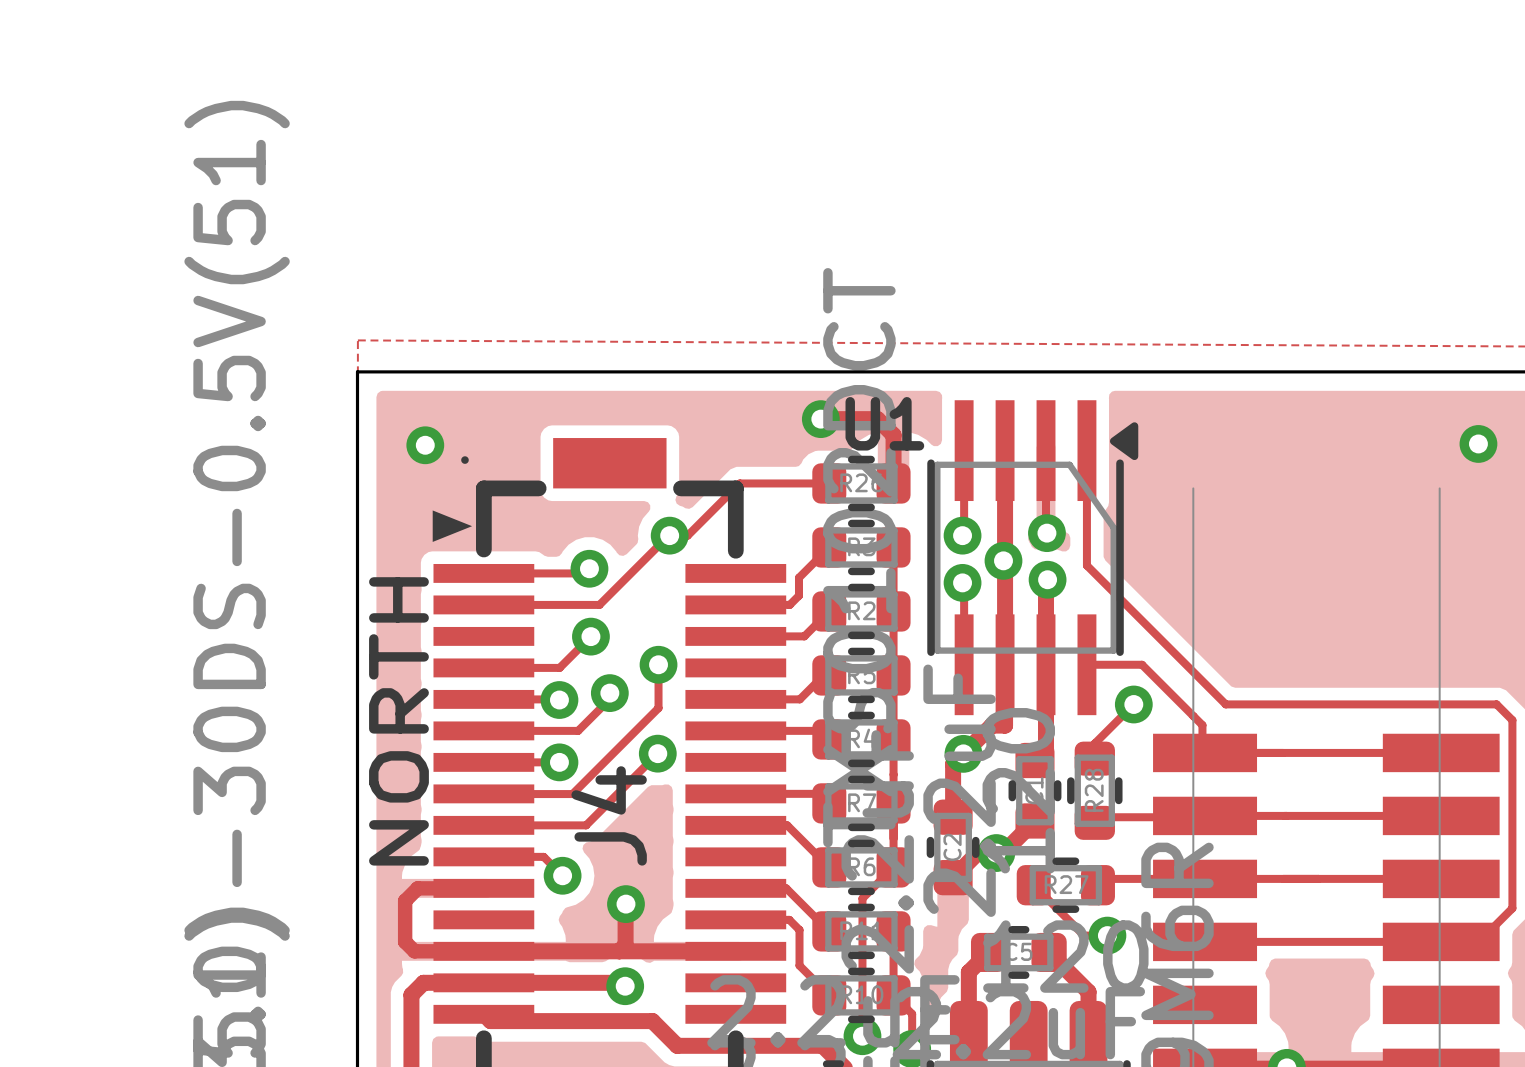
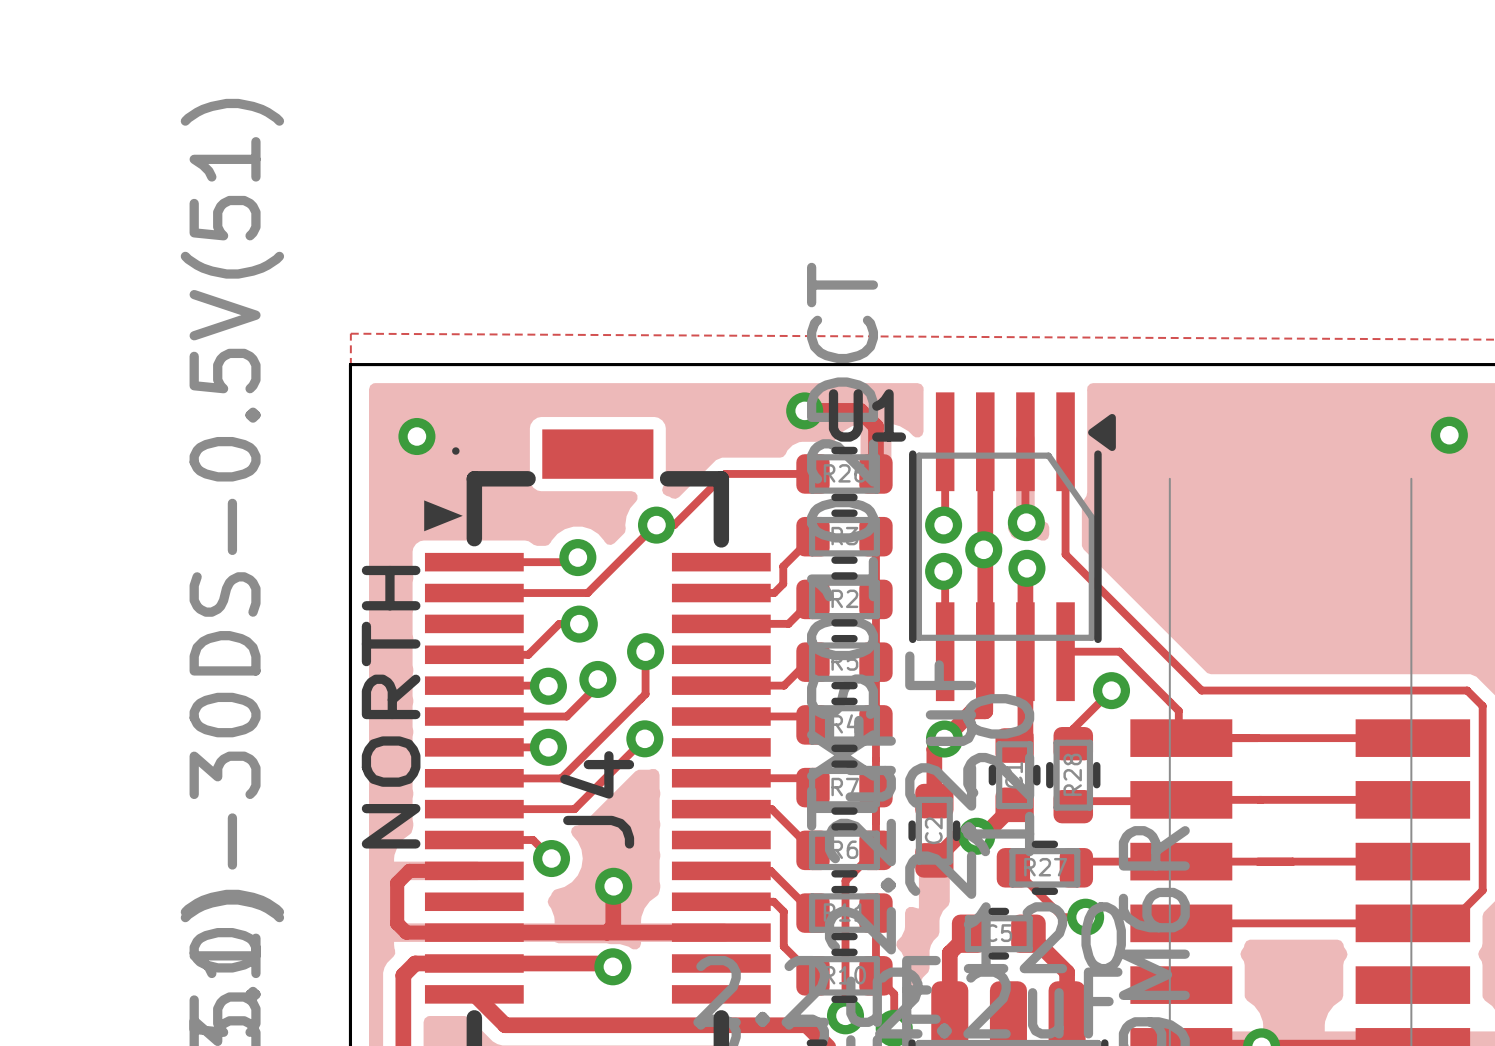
track: (590, 636) (559, 667) (538, 667) -> (579, 624) (559, 624) (528, 654)
track: (490, 1021) (652, 1021) (677, 1045) -> (480, 1001) (505, 1025) (663, 1025)

